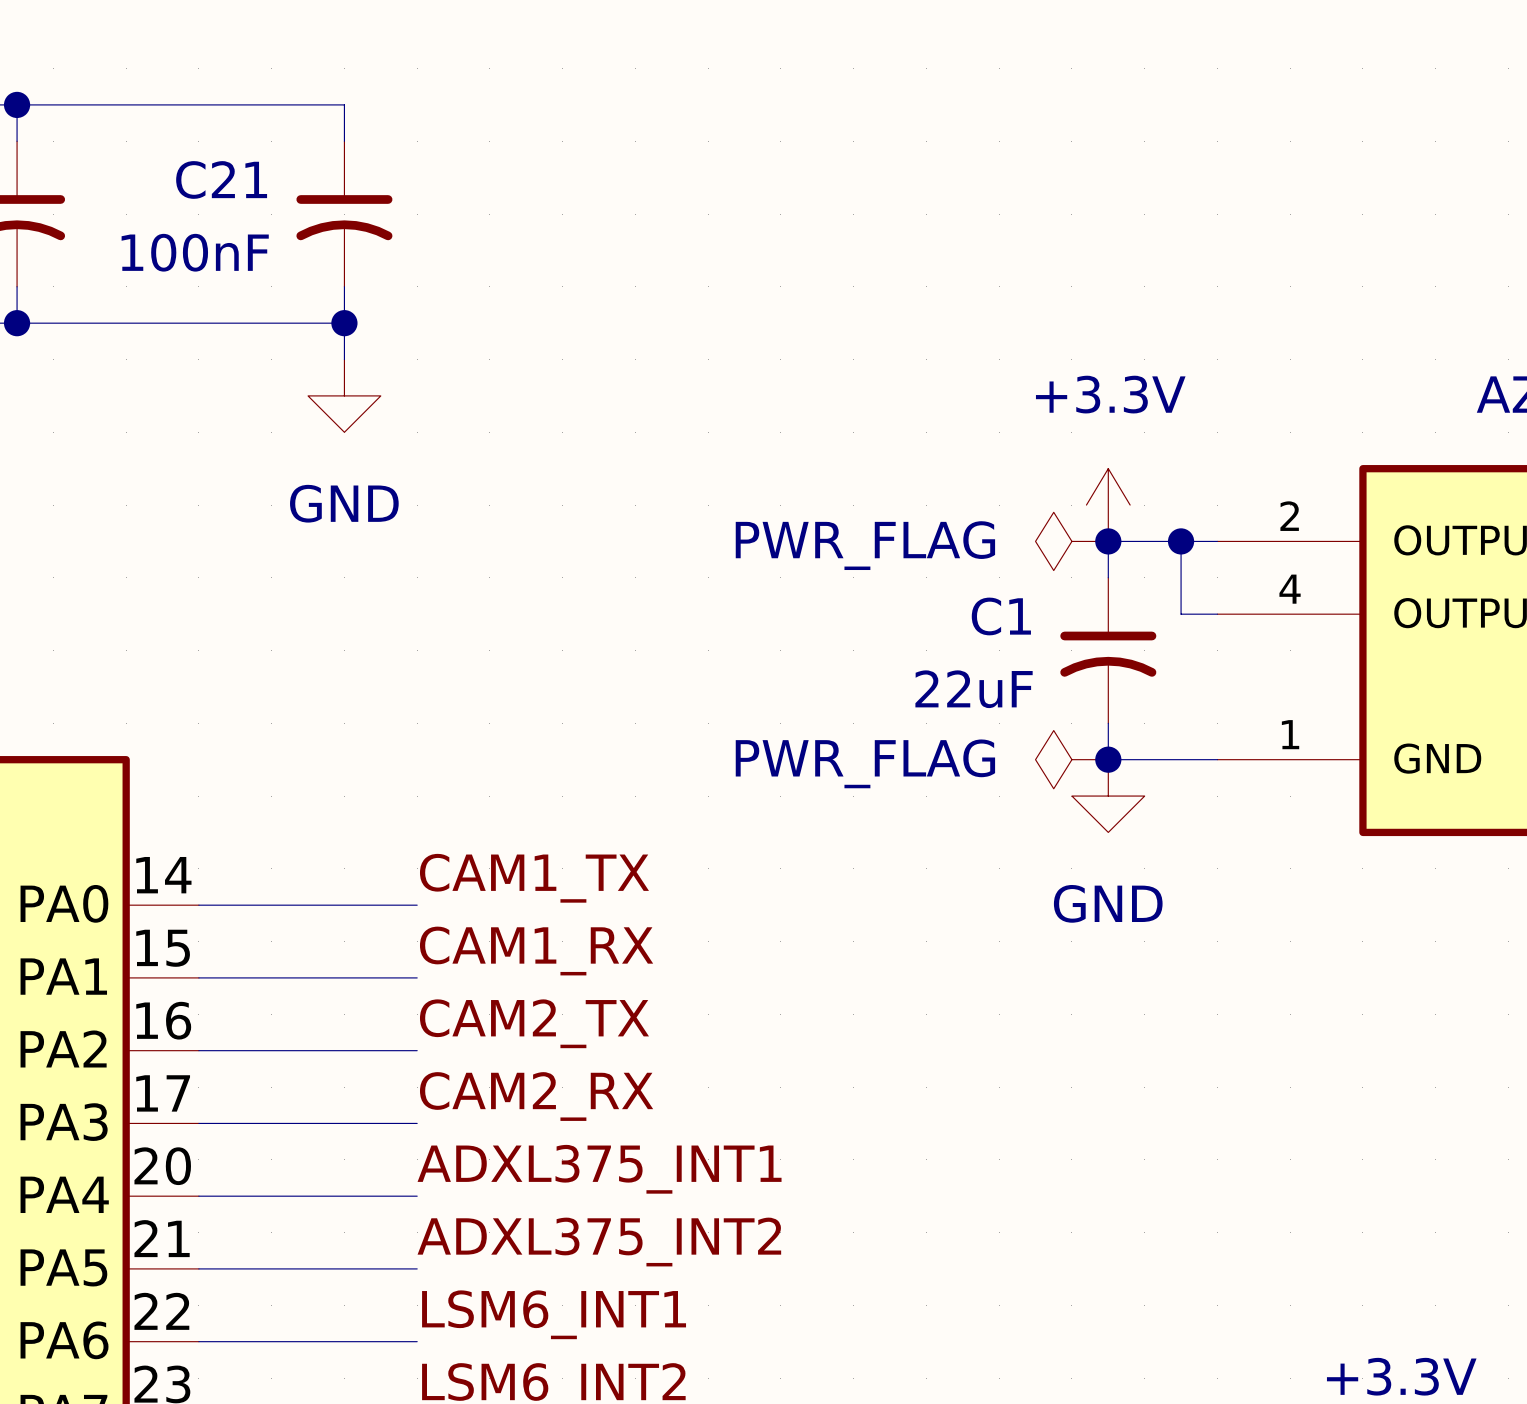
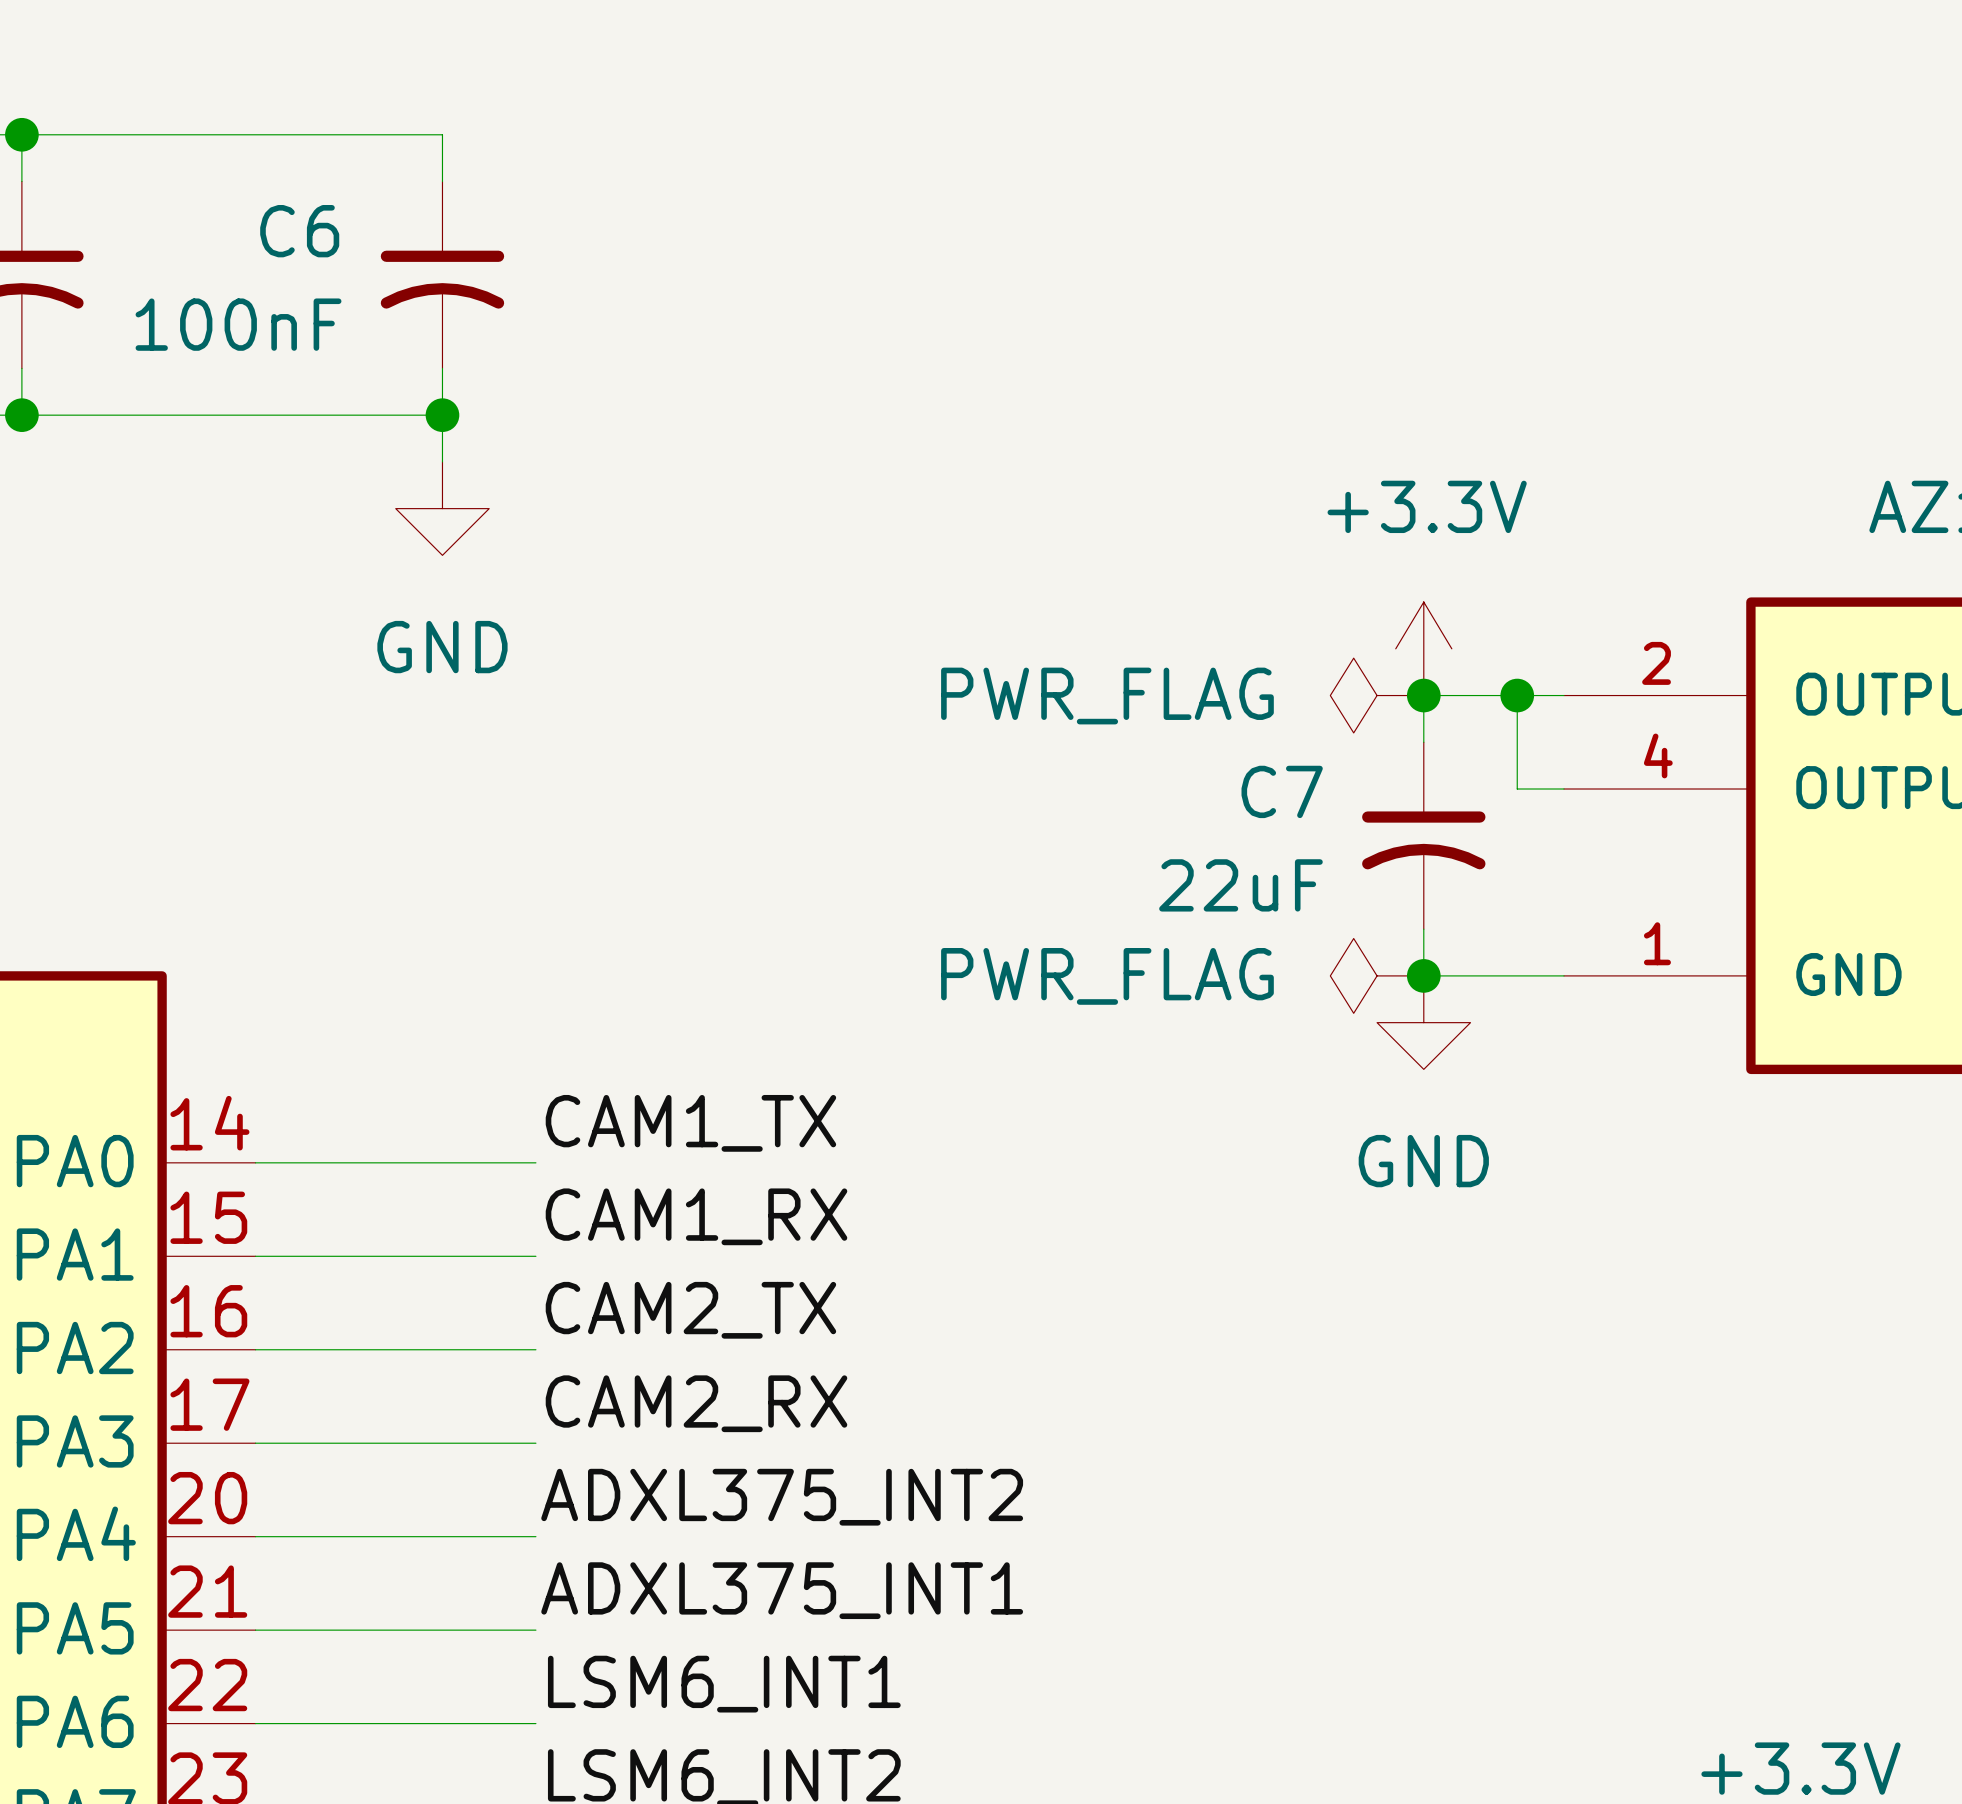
C21 name: C21 (221, 179) -> C6 (299, 231)
C1 name: C1 (1001, 616) -> C7 (1282, 791)
label: ADXL375_INT1 (599, 1169) -> ADXL375_INT2 (782, 1497)
label: ADXL375_INT2 (599, 1242) -> ADXL375_INT1 (782, 1590)

